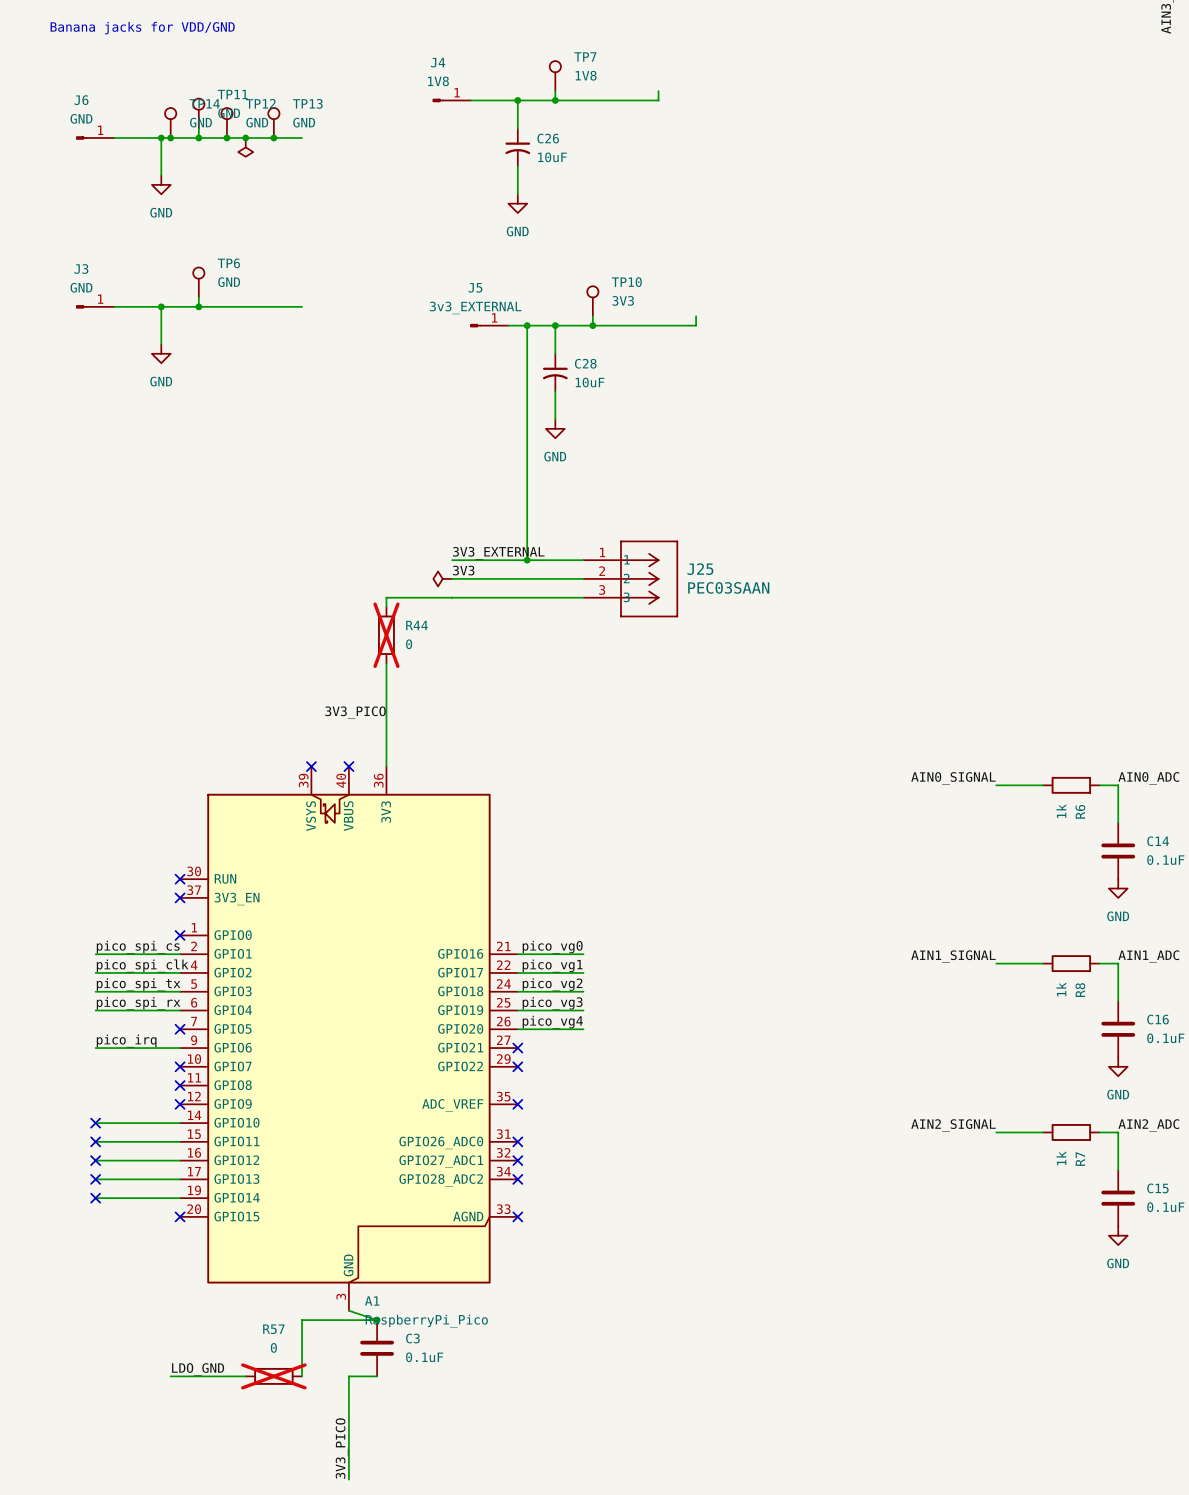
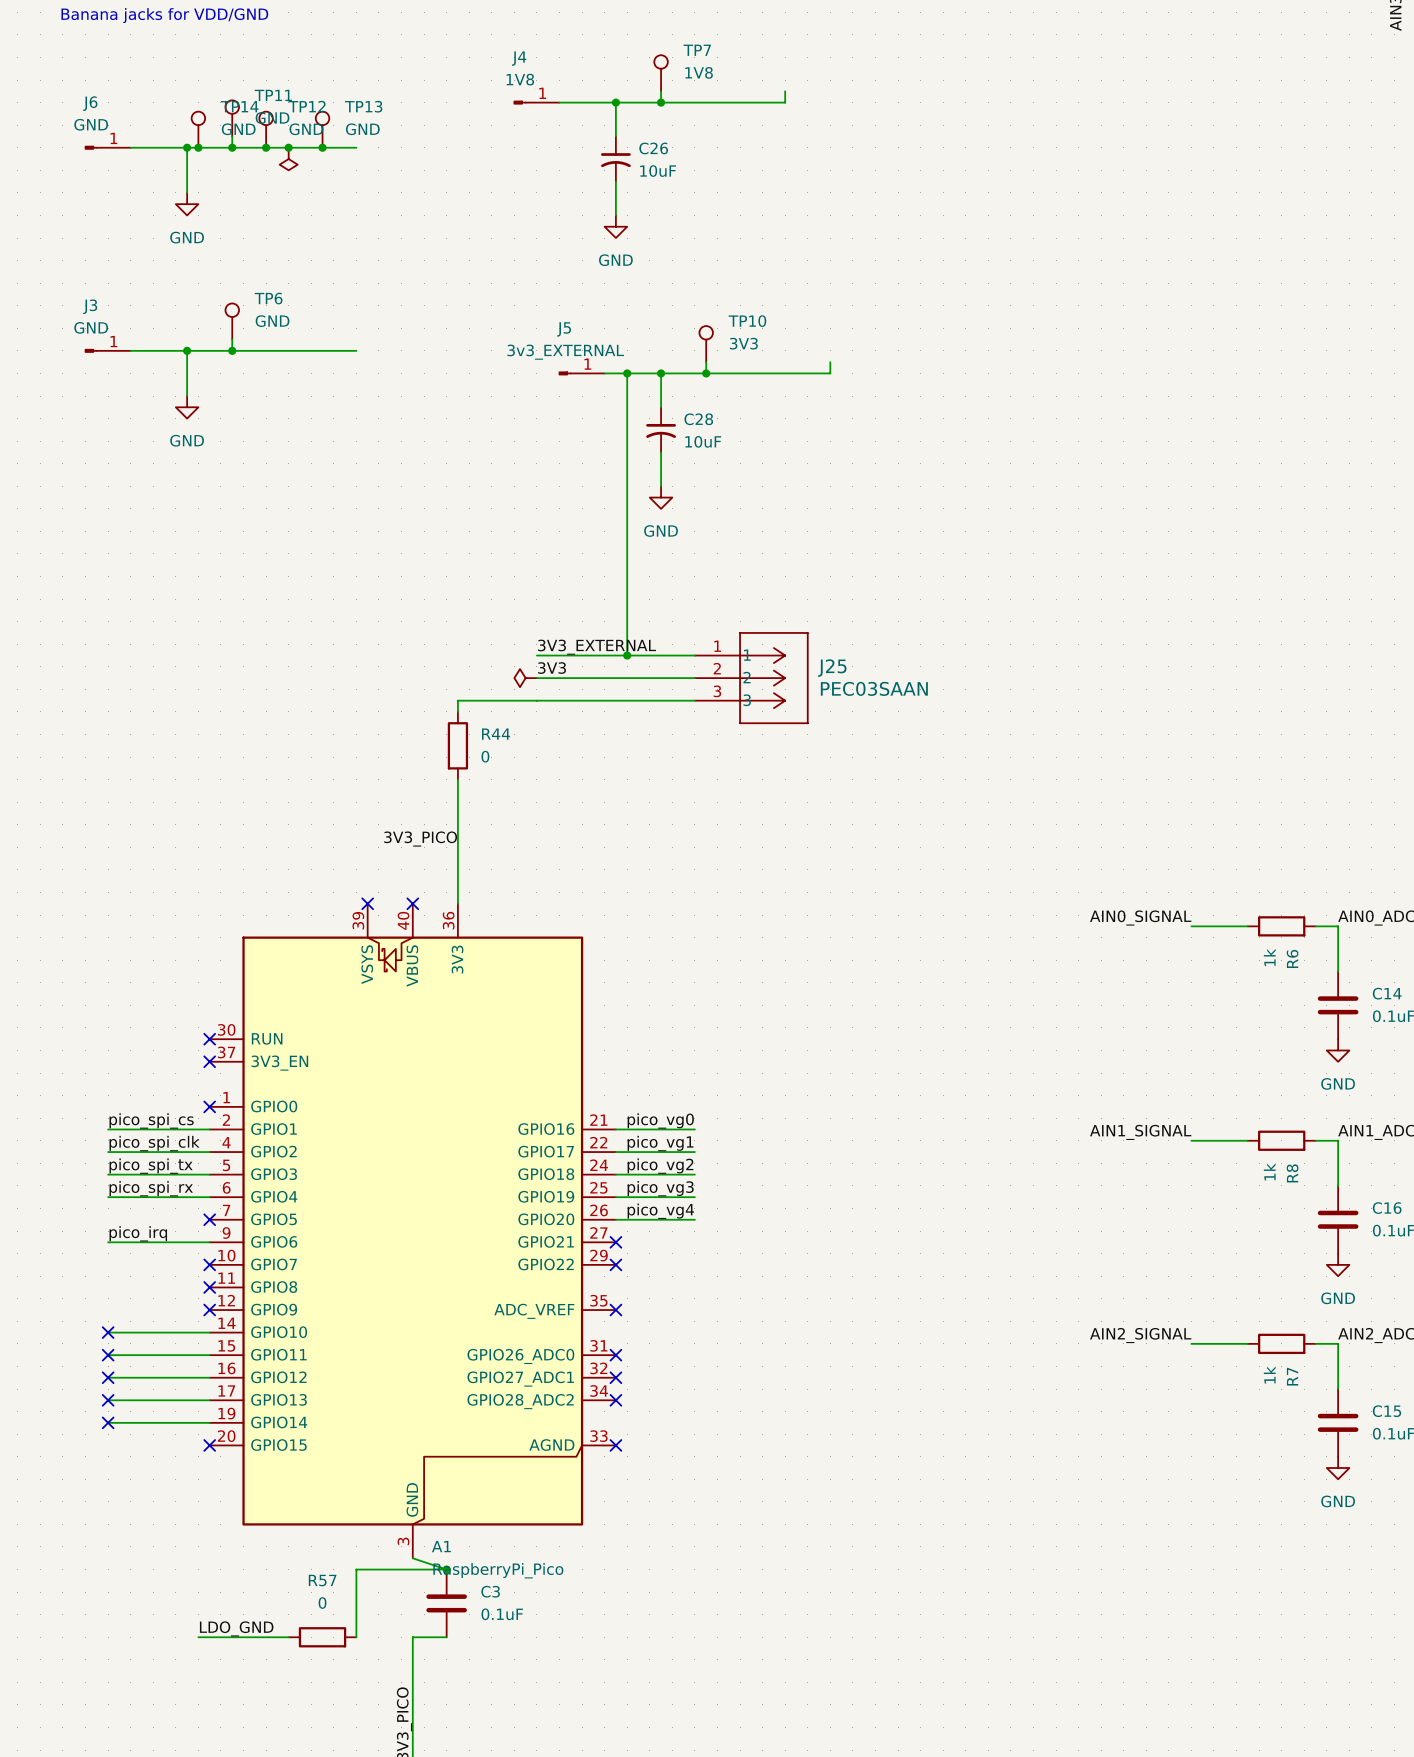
R44 do-not-place cross: (386, 635) -> none
R57 do-not-place cross: (273, 1376) -> none

